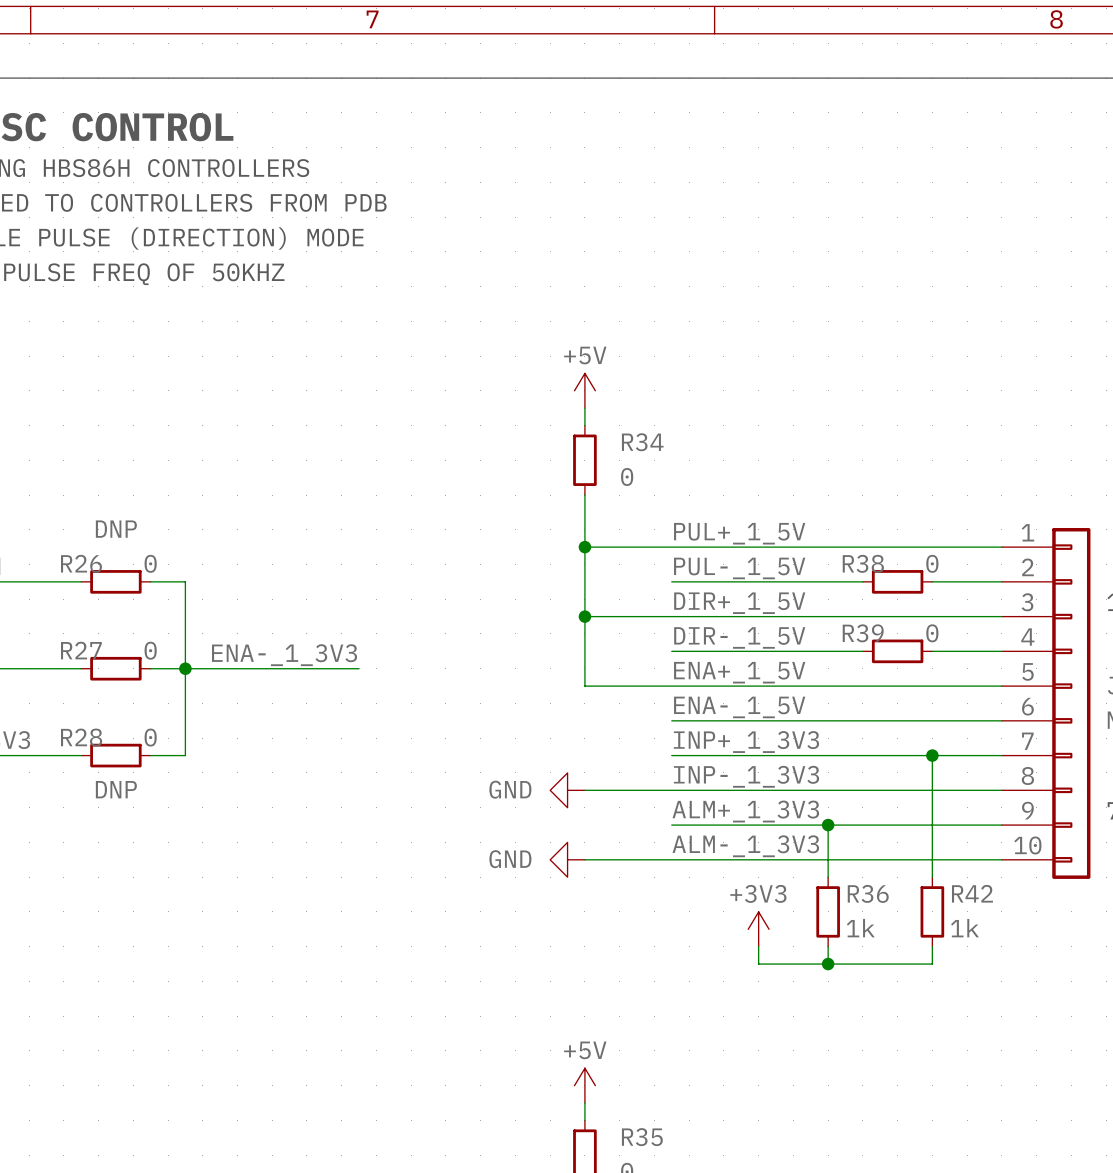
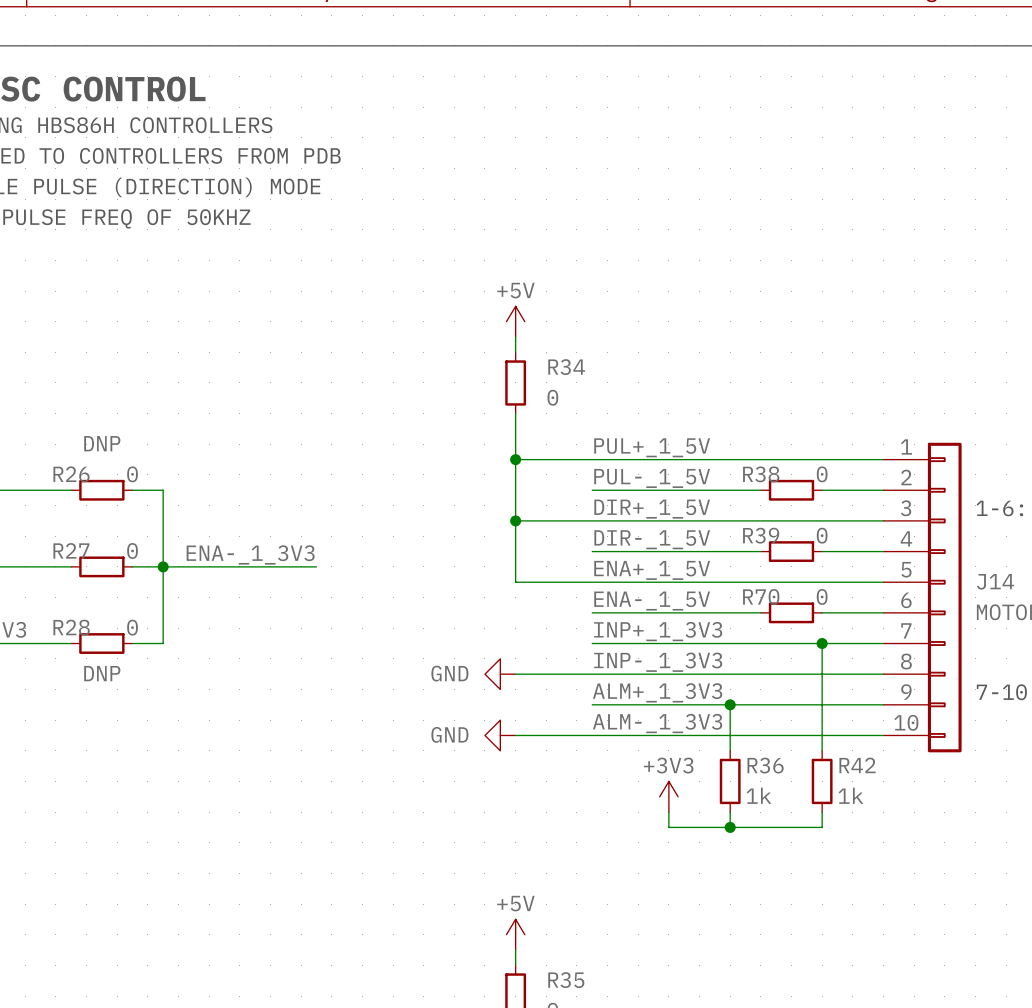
wire: (862, 720) (932, 720) -> none
R70: none -> 0 (791, 612)

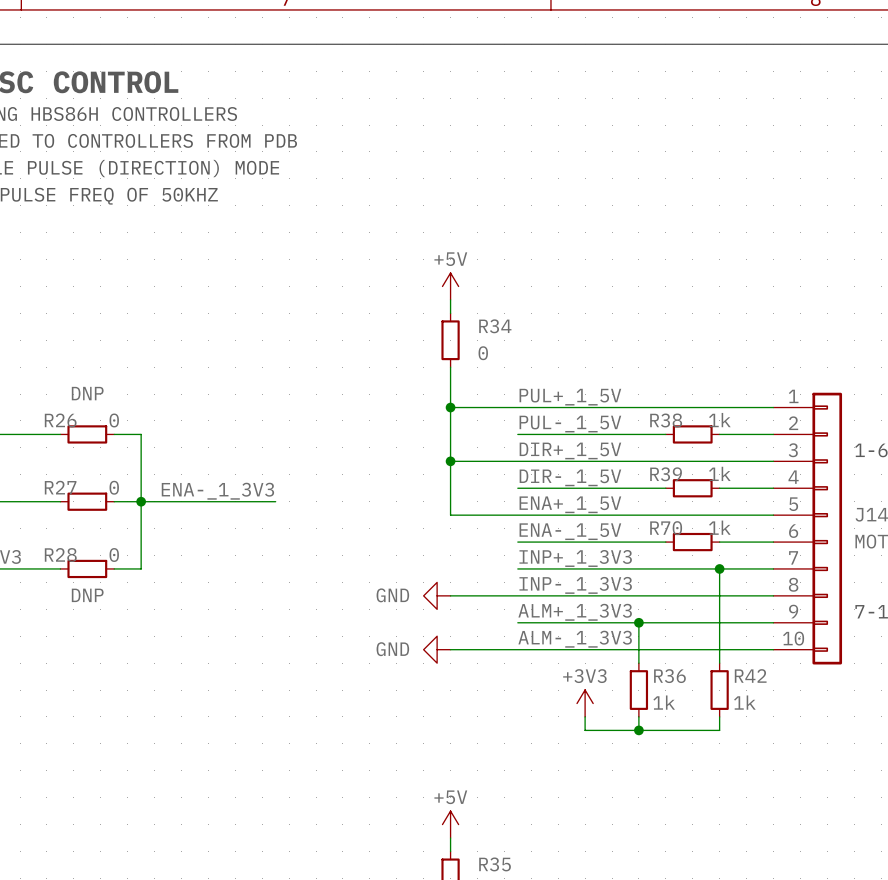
R38 value: 0 (822, 474) -> 1k (719, 420)
R39 value: 0 (822, 535) -> 1k (719, 473)
R70 value: 0 (822, 596) -> 1k (719, 527)

